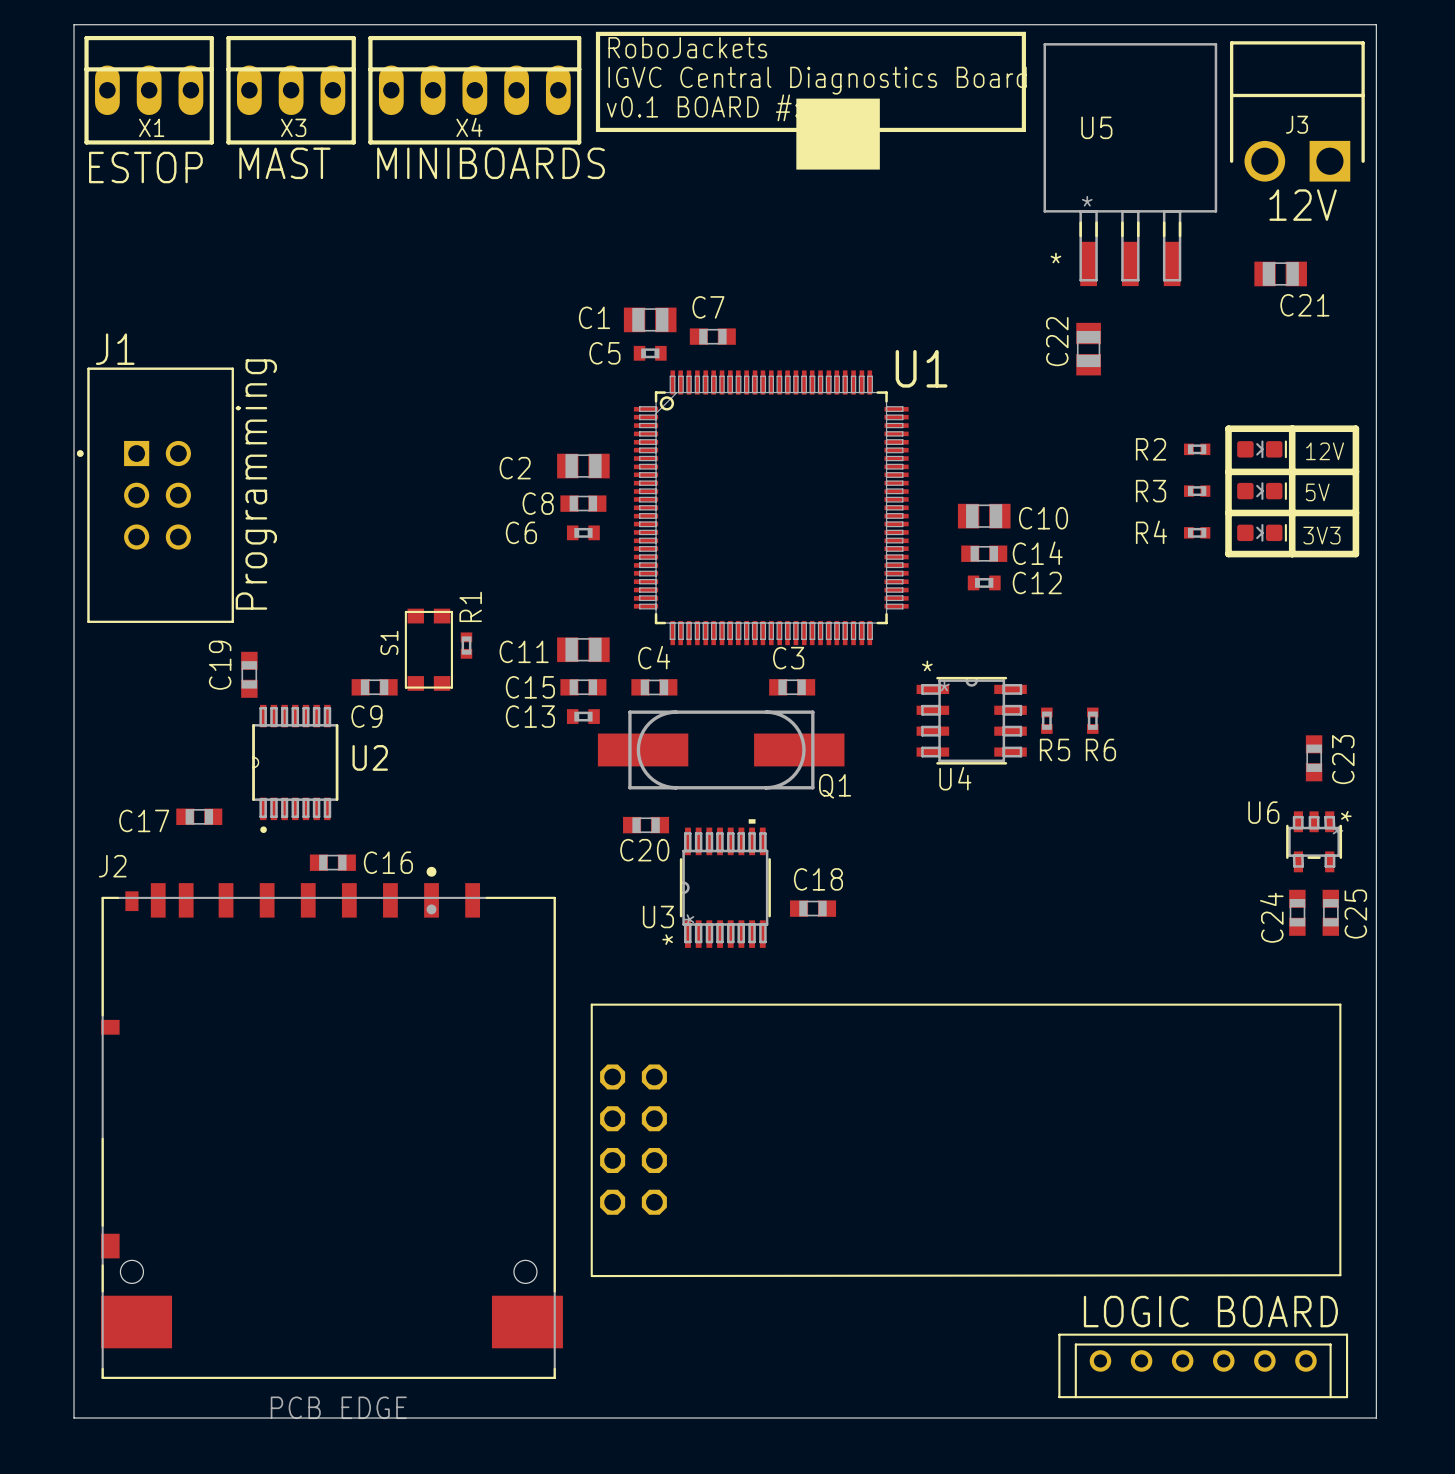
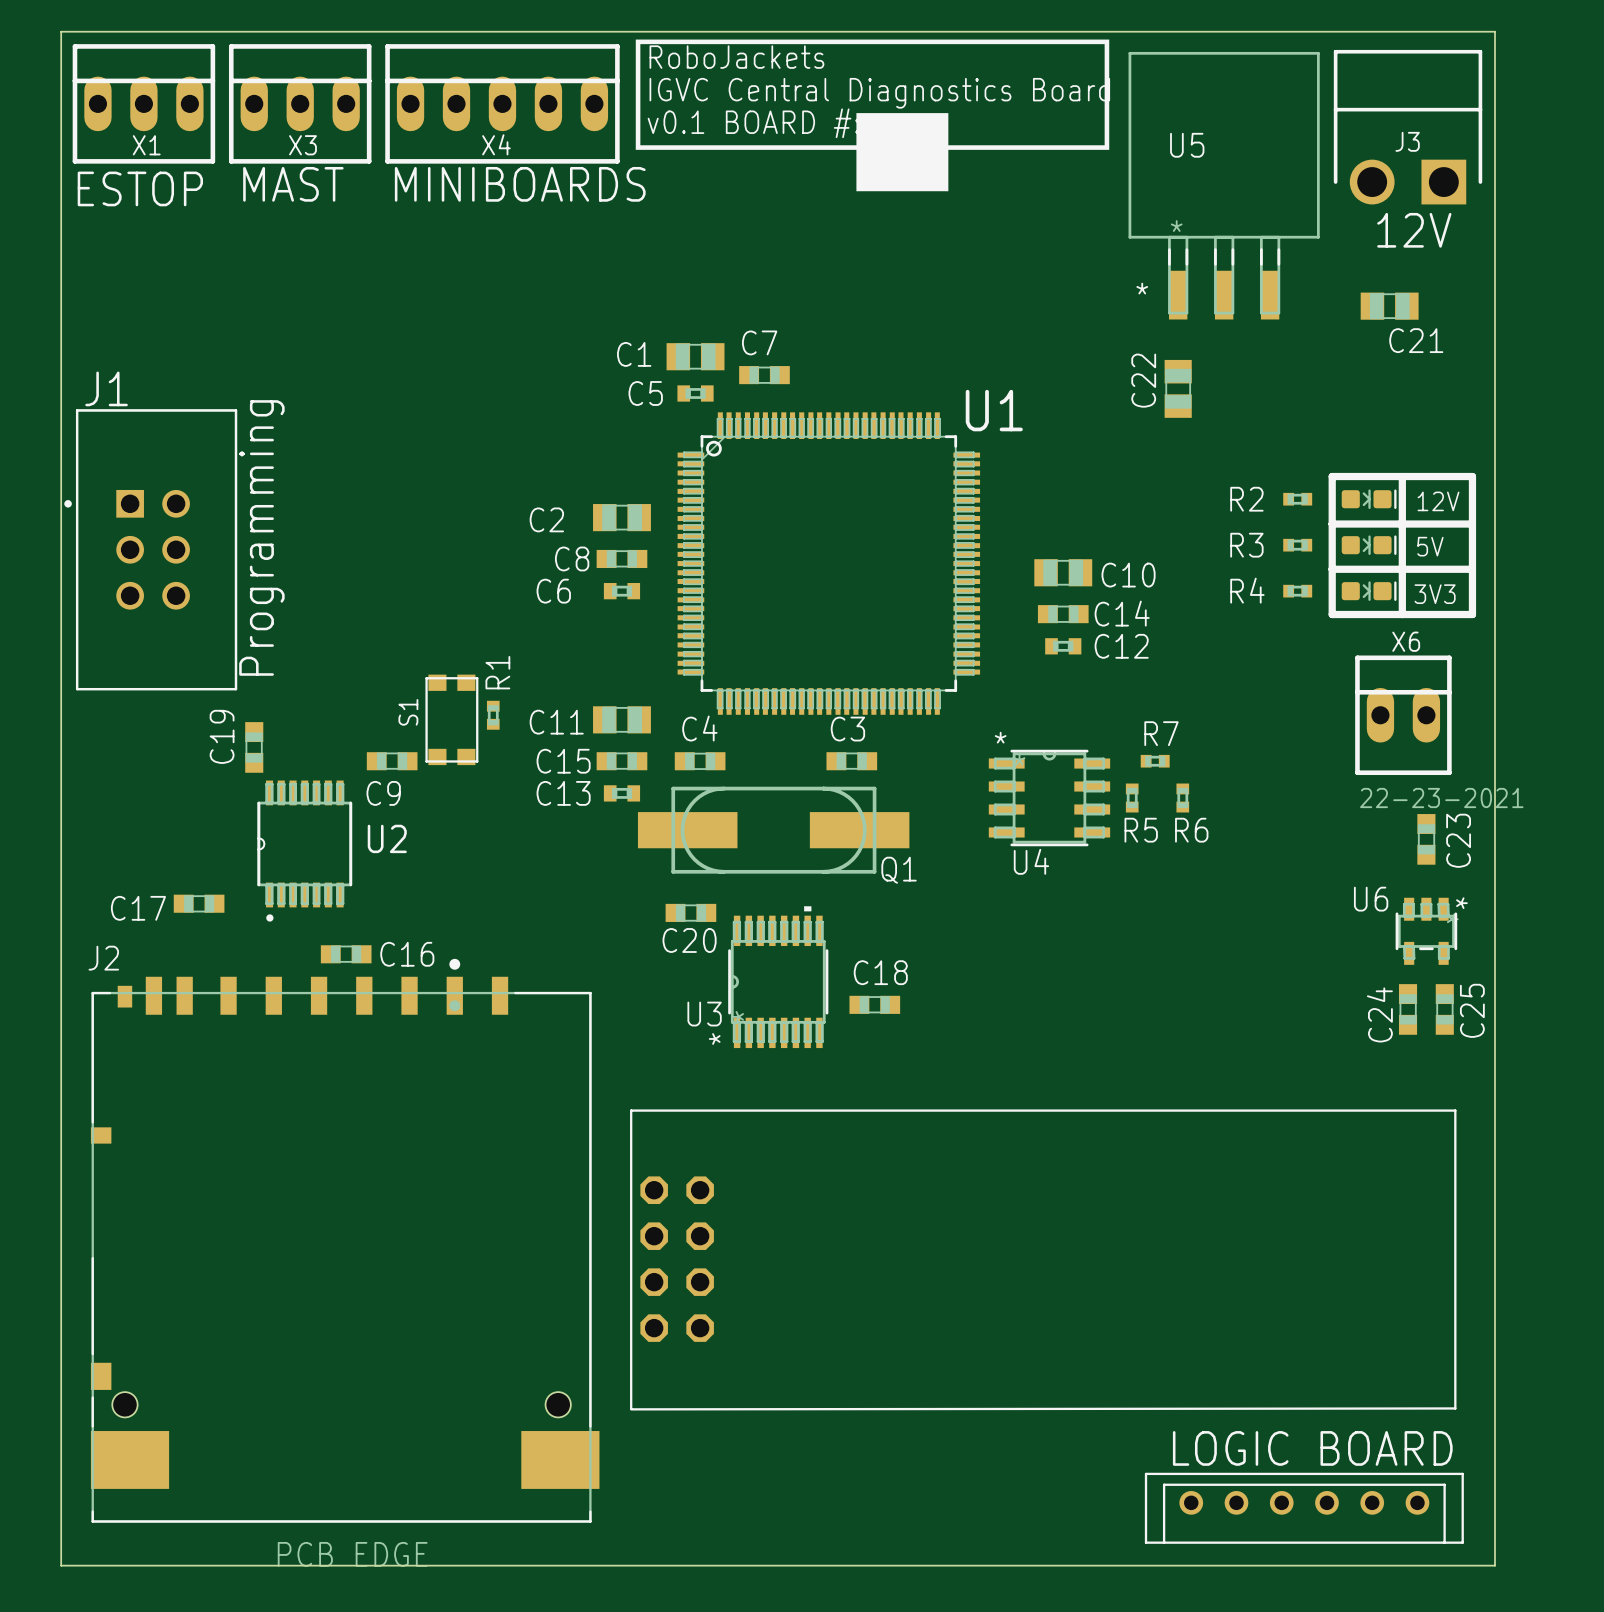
X6: none -> 22-23-2021 (1403, 715)
R7: none -> (1155, 761)

